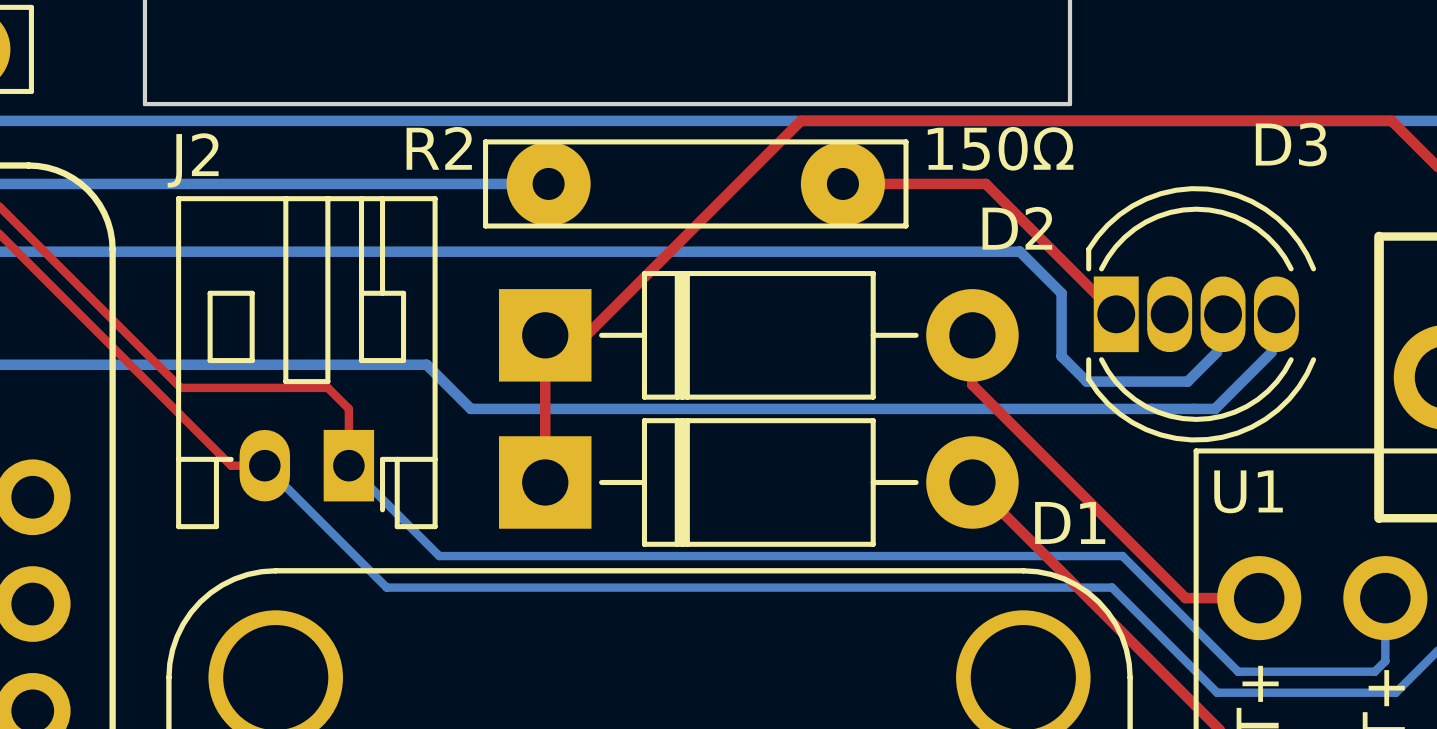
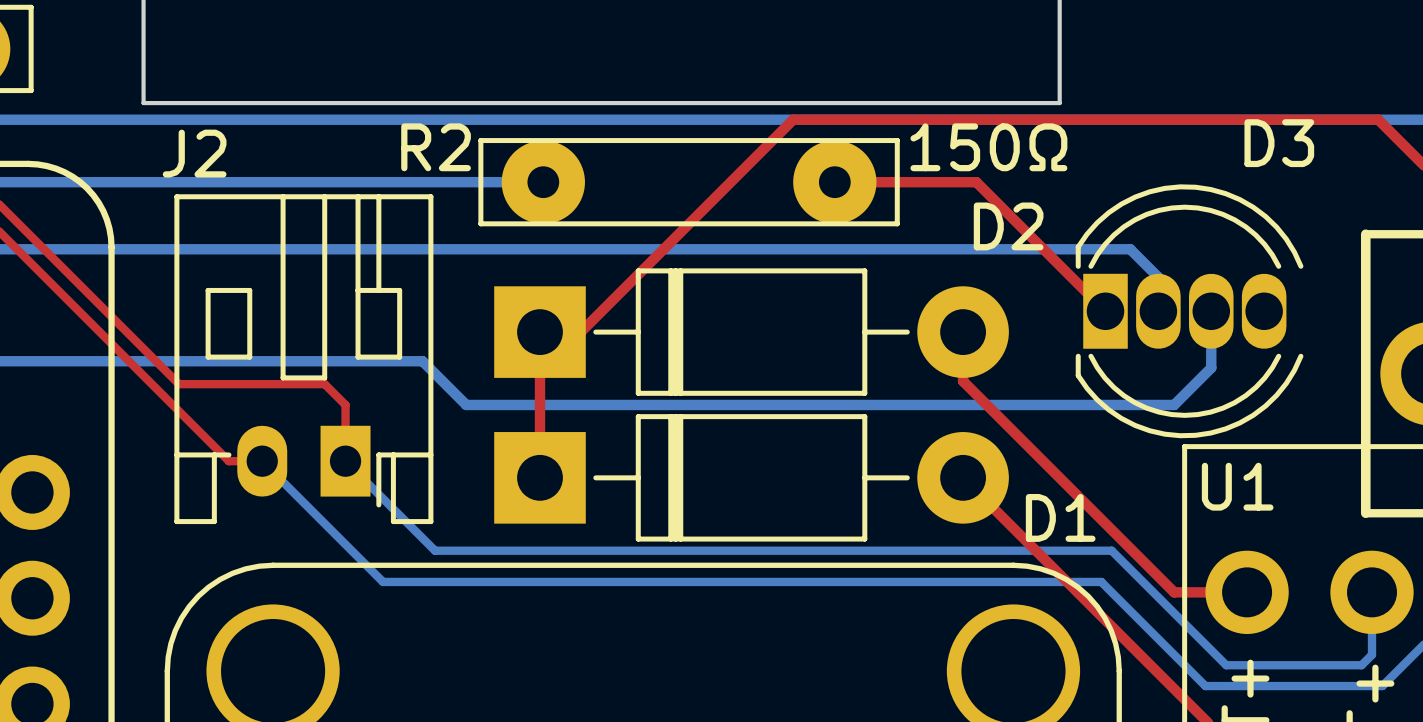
bottom track: (1020, 251) (1061, 293) (1061, 356) (1086, 381) (1187, 381) (1217, 352) -> (1010, 249) (1130, 249) (1158, 277) (1158, 311)
bottom track: (1271, 352) (1215, 408) (1185, 408) -> (1211, 342) (1211, 367) (1174, 404)

